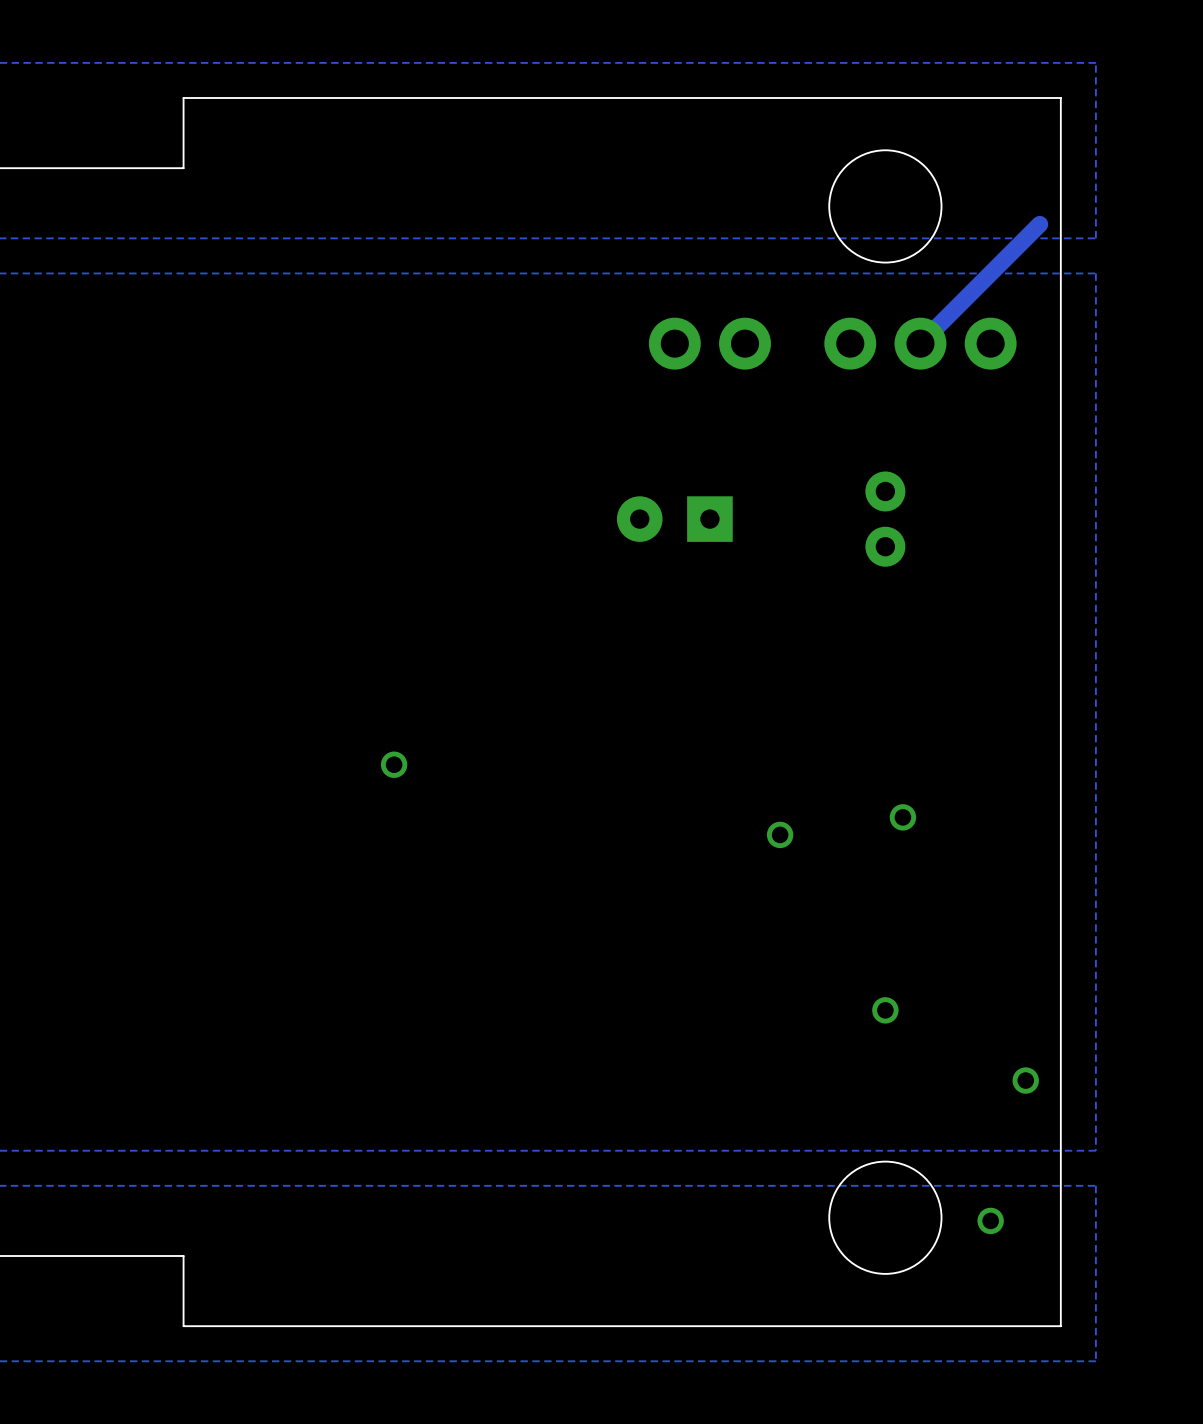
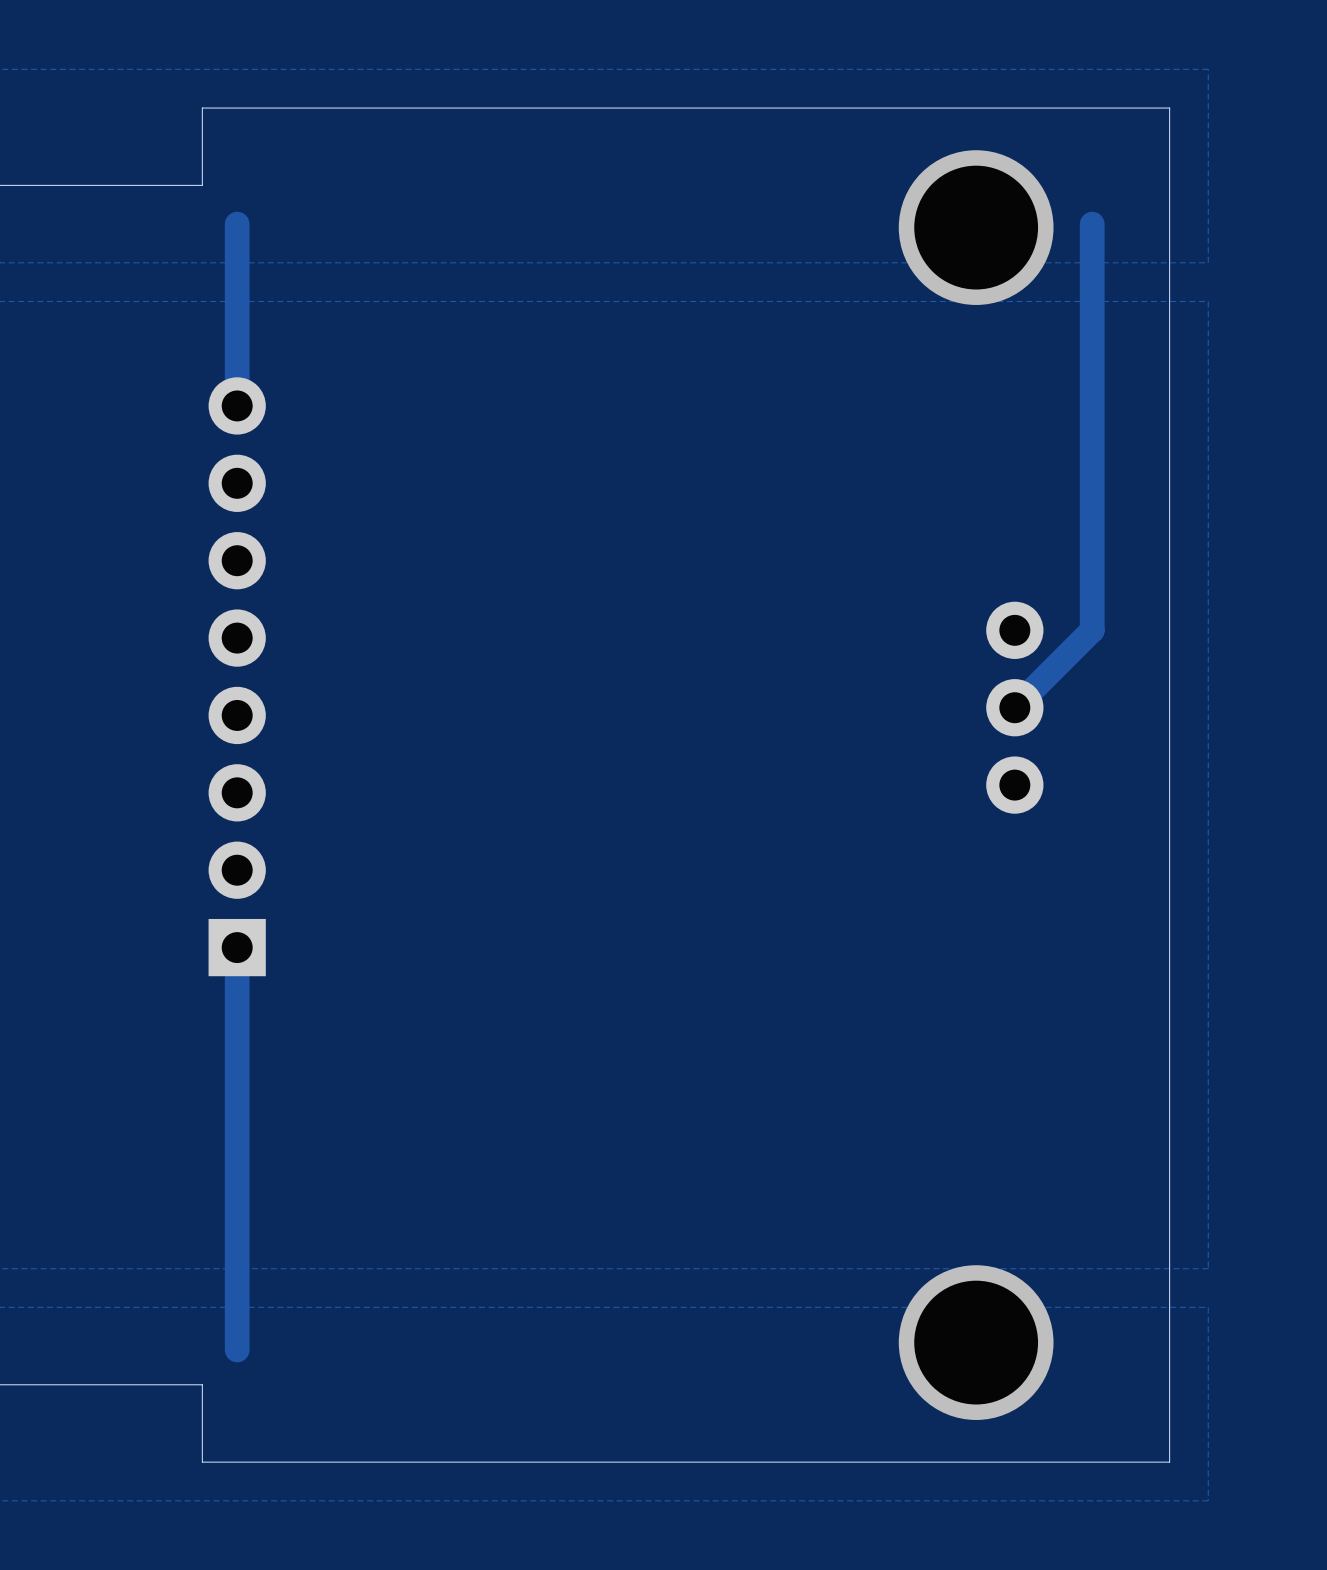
round board edge: [828, 149, 942, 263] -> none
track: none -> (237, 224) (237, 405)
track: none -> (1092, 224) (1092, 630) (1014, 707)
via: none -> (976, 227)
track: (1039, 224) (920, 343) -> none
part: (709, 343) -> none
part rotation: 0° (920, 343) -> 90° clockwise (1014, 707)
part position: (920, 343) -> (1014, 707)
part: (674, 519) -> none
part: (885, 519) -> none
part: none -> (237, 676)
via: (394, 764) -> none
via: (902, 817) -> none
via: (780, 834) -> none
track: none -> (237, 947) (237, 1349)
via: (885, 1010) -> none
via: (1025, 1080) -> none
round board edge: [828, 1161, 942, 1275] -> none
via: none -> (976, 1342)
via: (990, 1220) -> none

